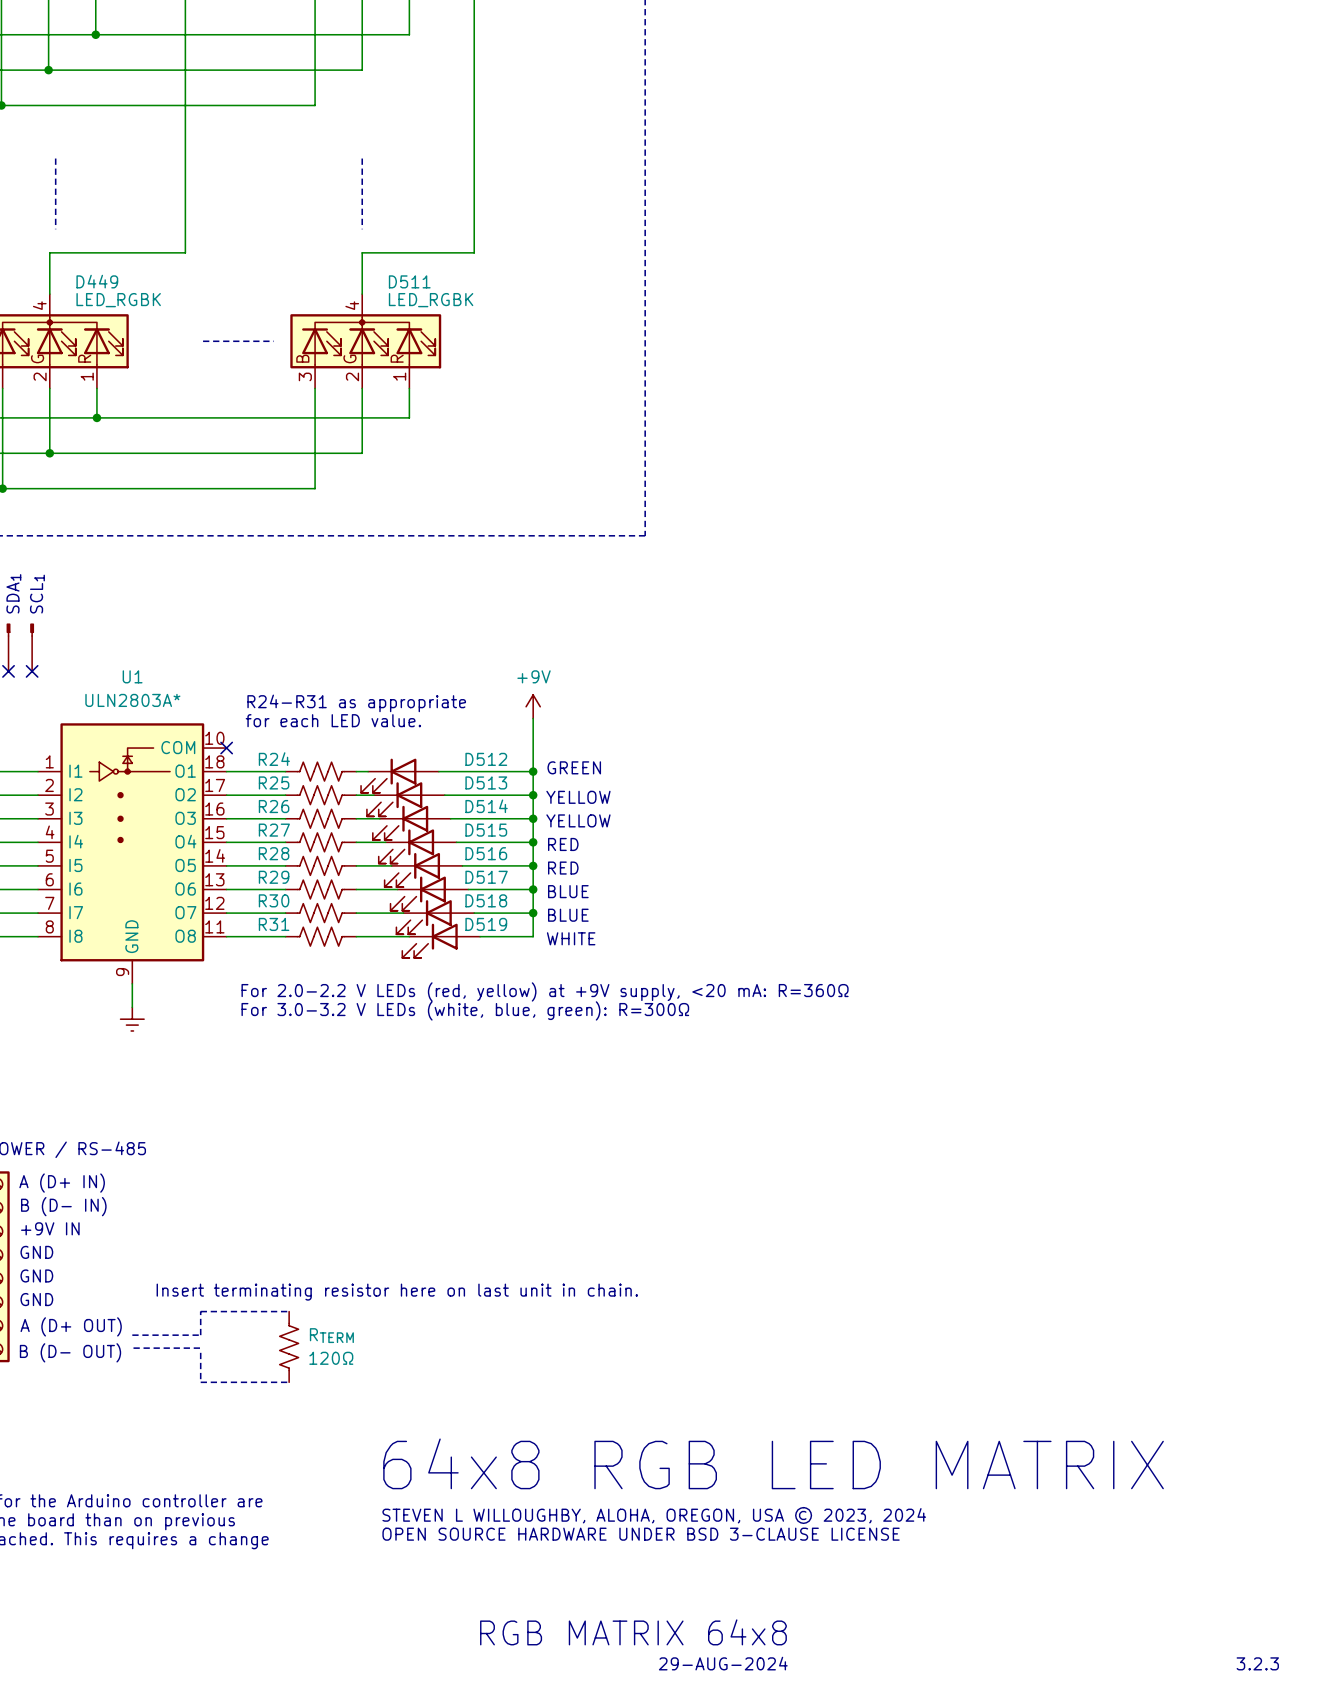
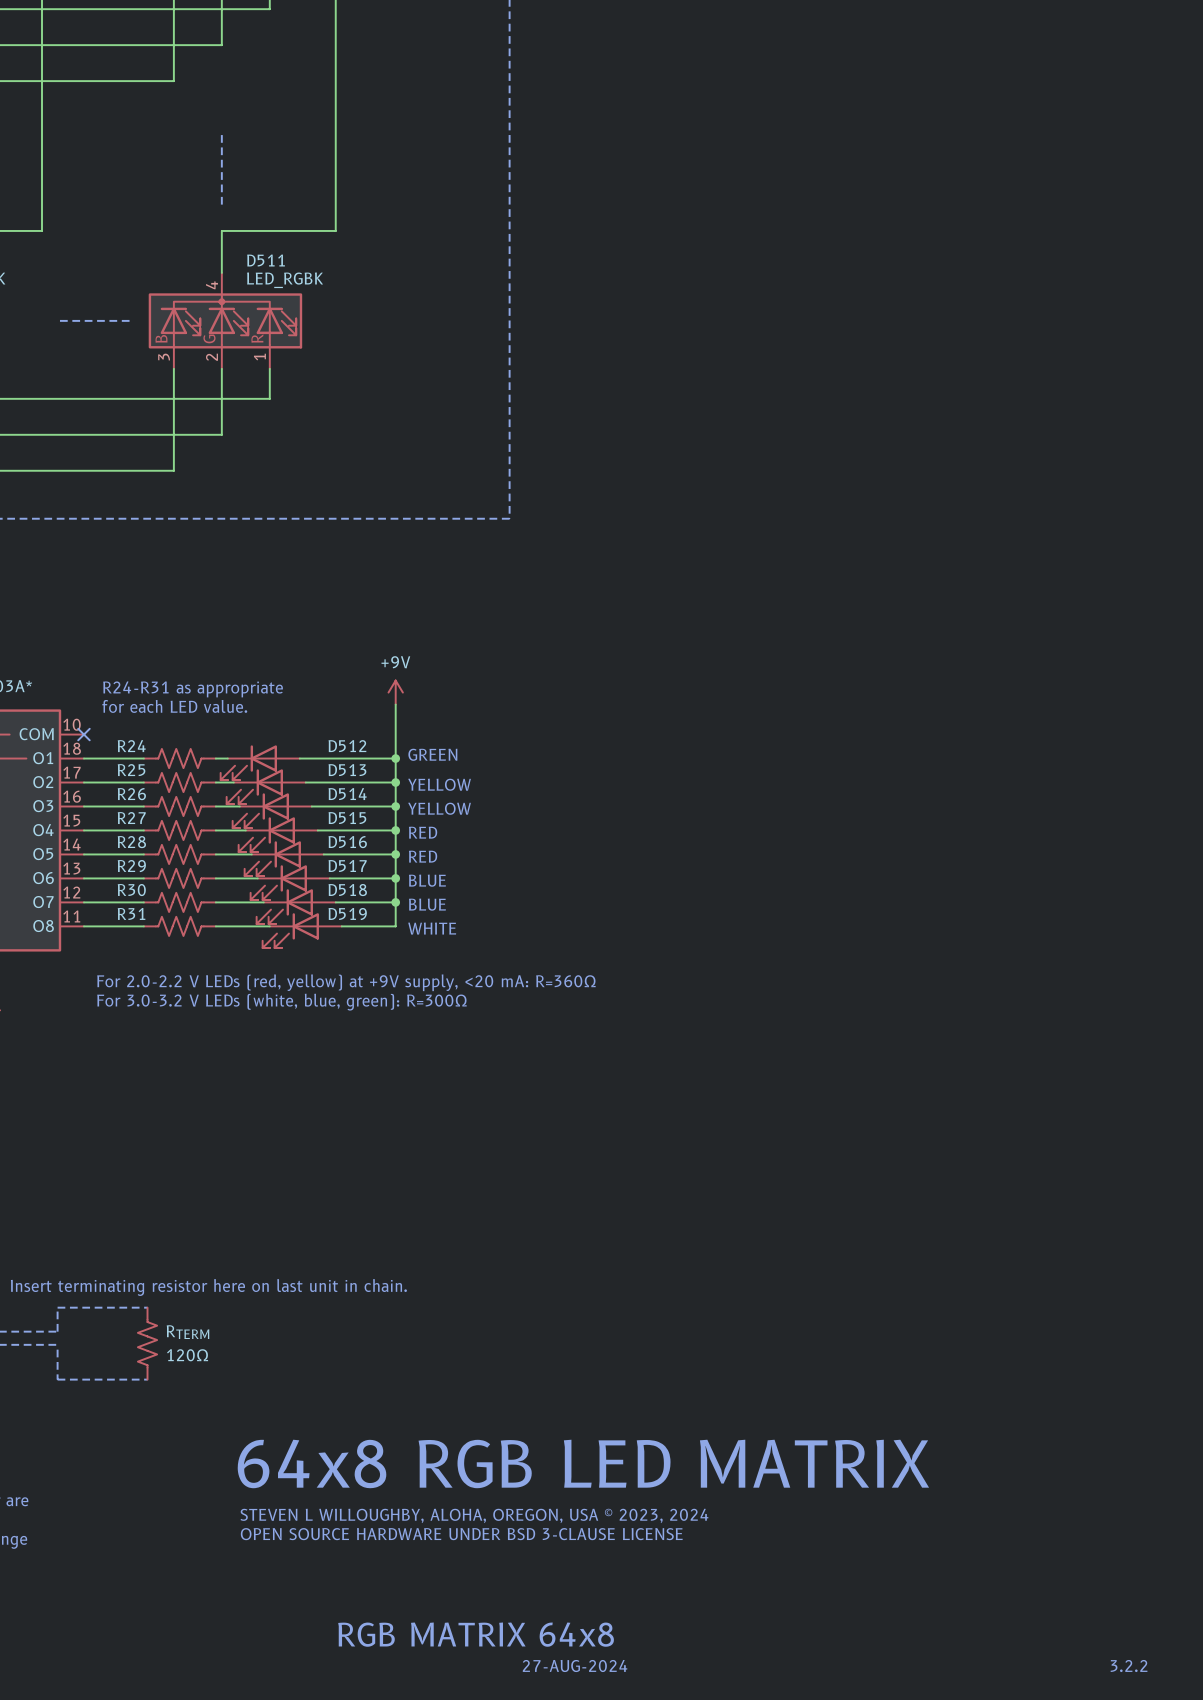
text: 29-AUG-2024 (723, 1663) -> 27-AUG-2024 (575, 1666)
text: 3.2.3 (1257, 1663) -> 3.2.2 (1129, 1666)

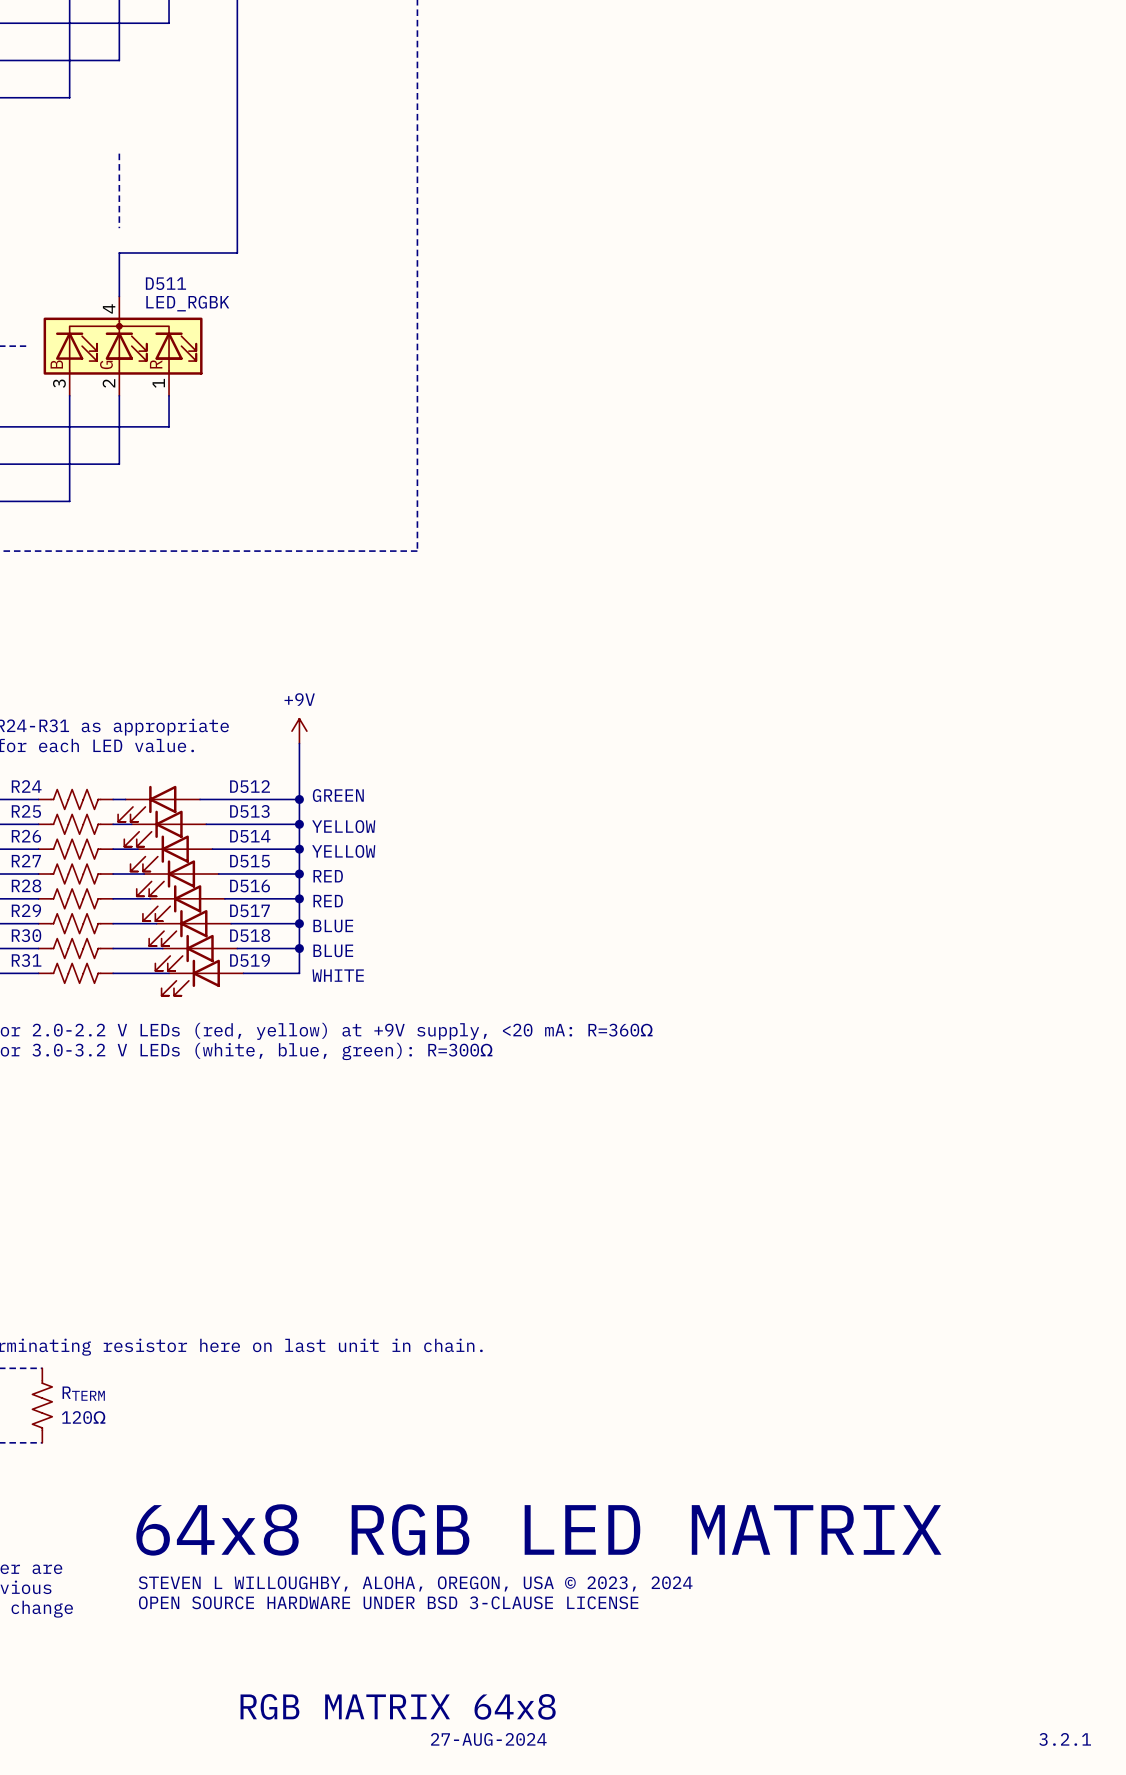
text: 3.2.2 (1129, 1666) -> 3.2.1 (1065, 1739)

